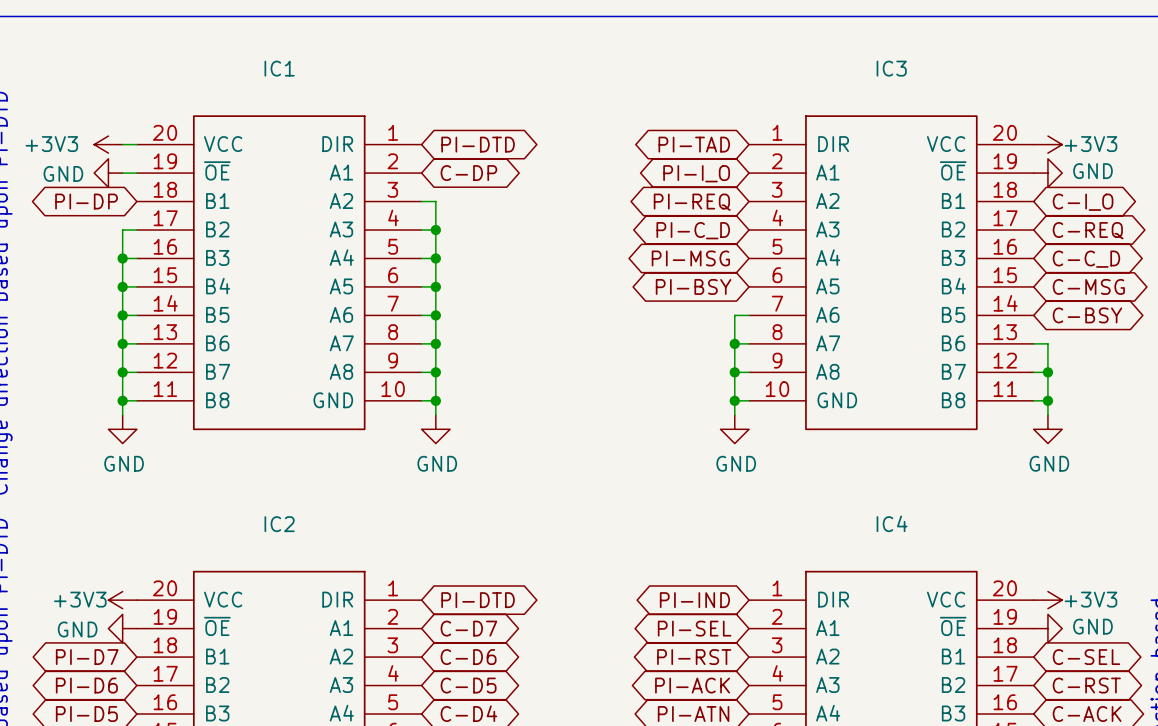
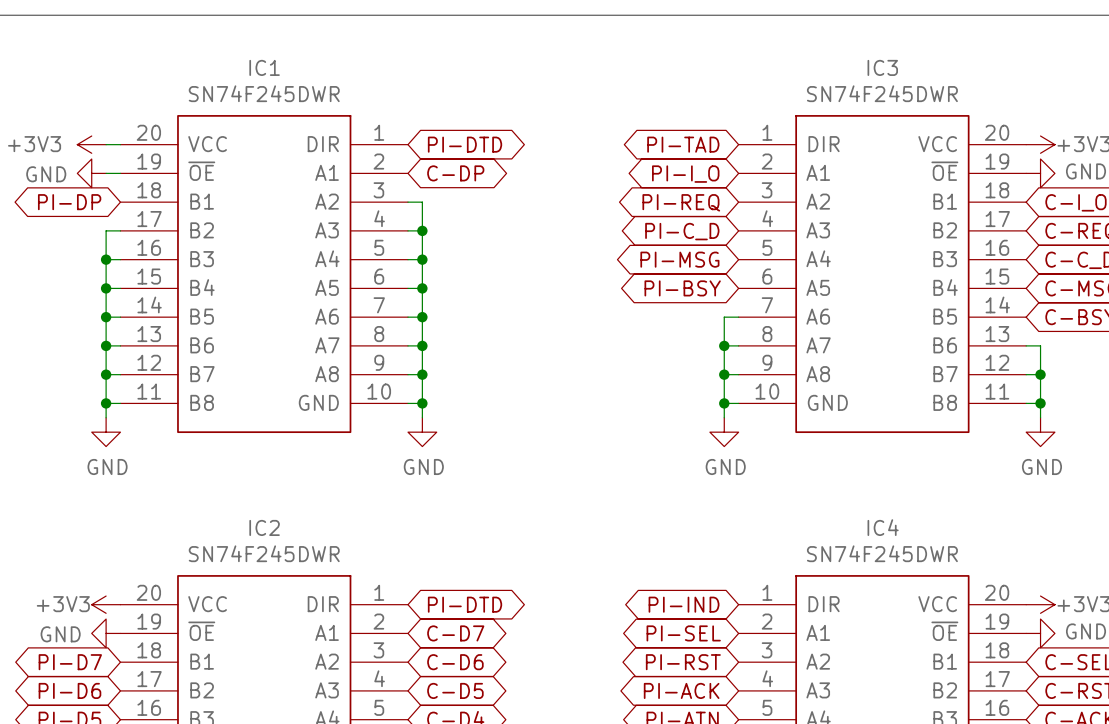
IC1 value: none -> SN74F245DWR (264, 93)
IC3 value: none -> SN74F245DWR (882, 93)
IC2 value: none -> SN74F245DWR (264, 553)
IC4 value: none -> SN74F245DWR (882, 553)

